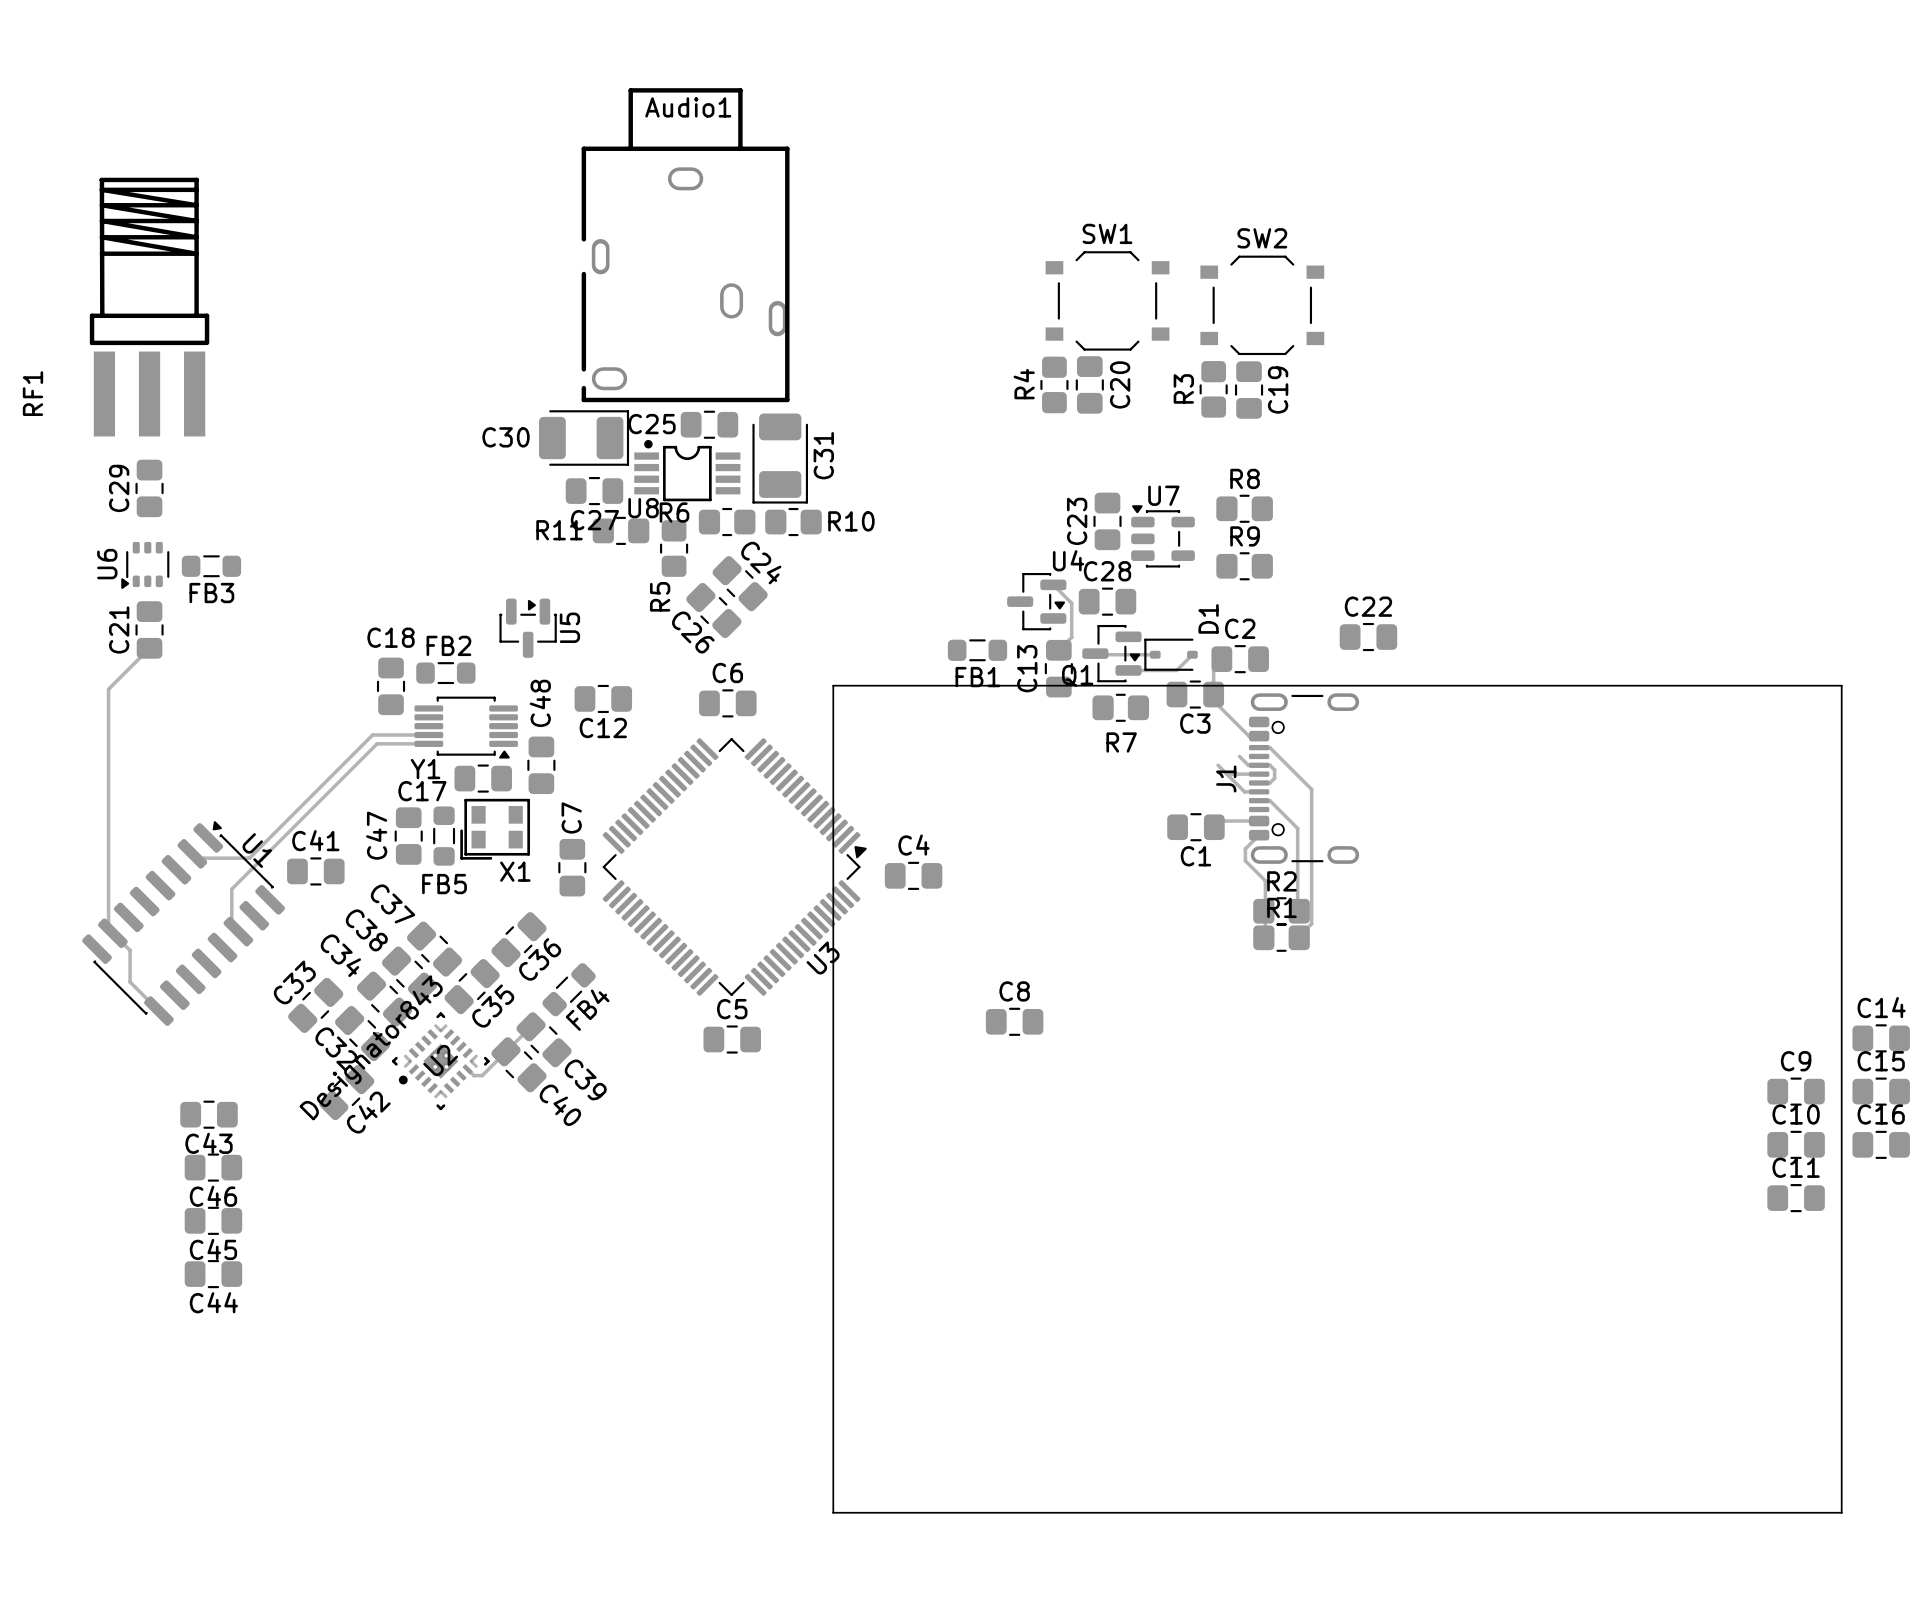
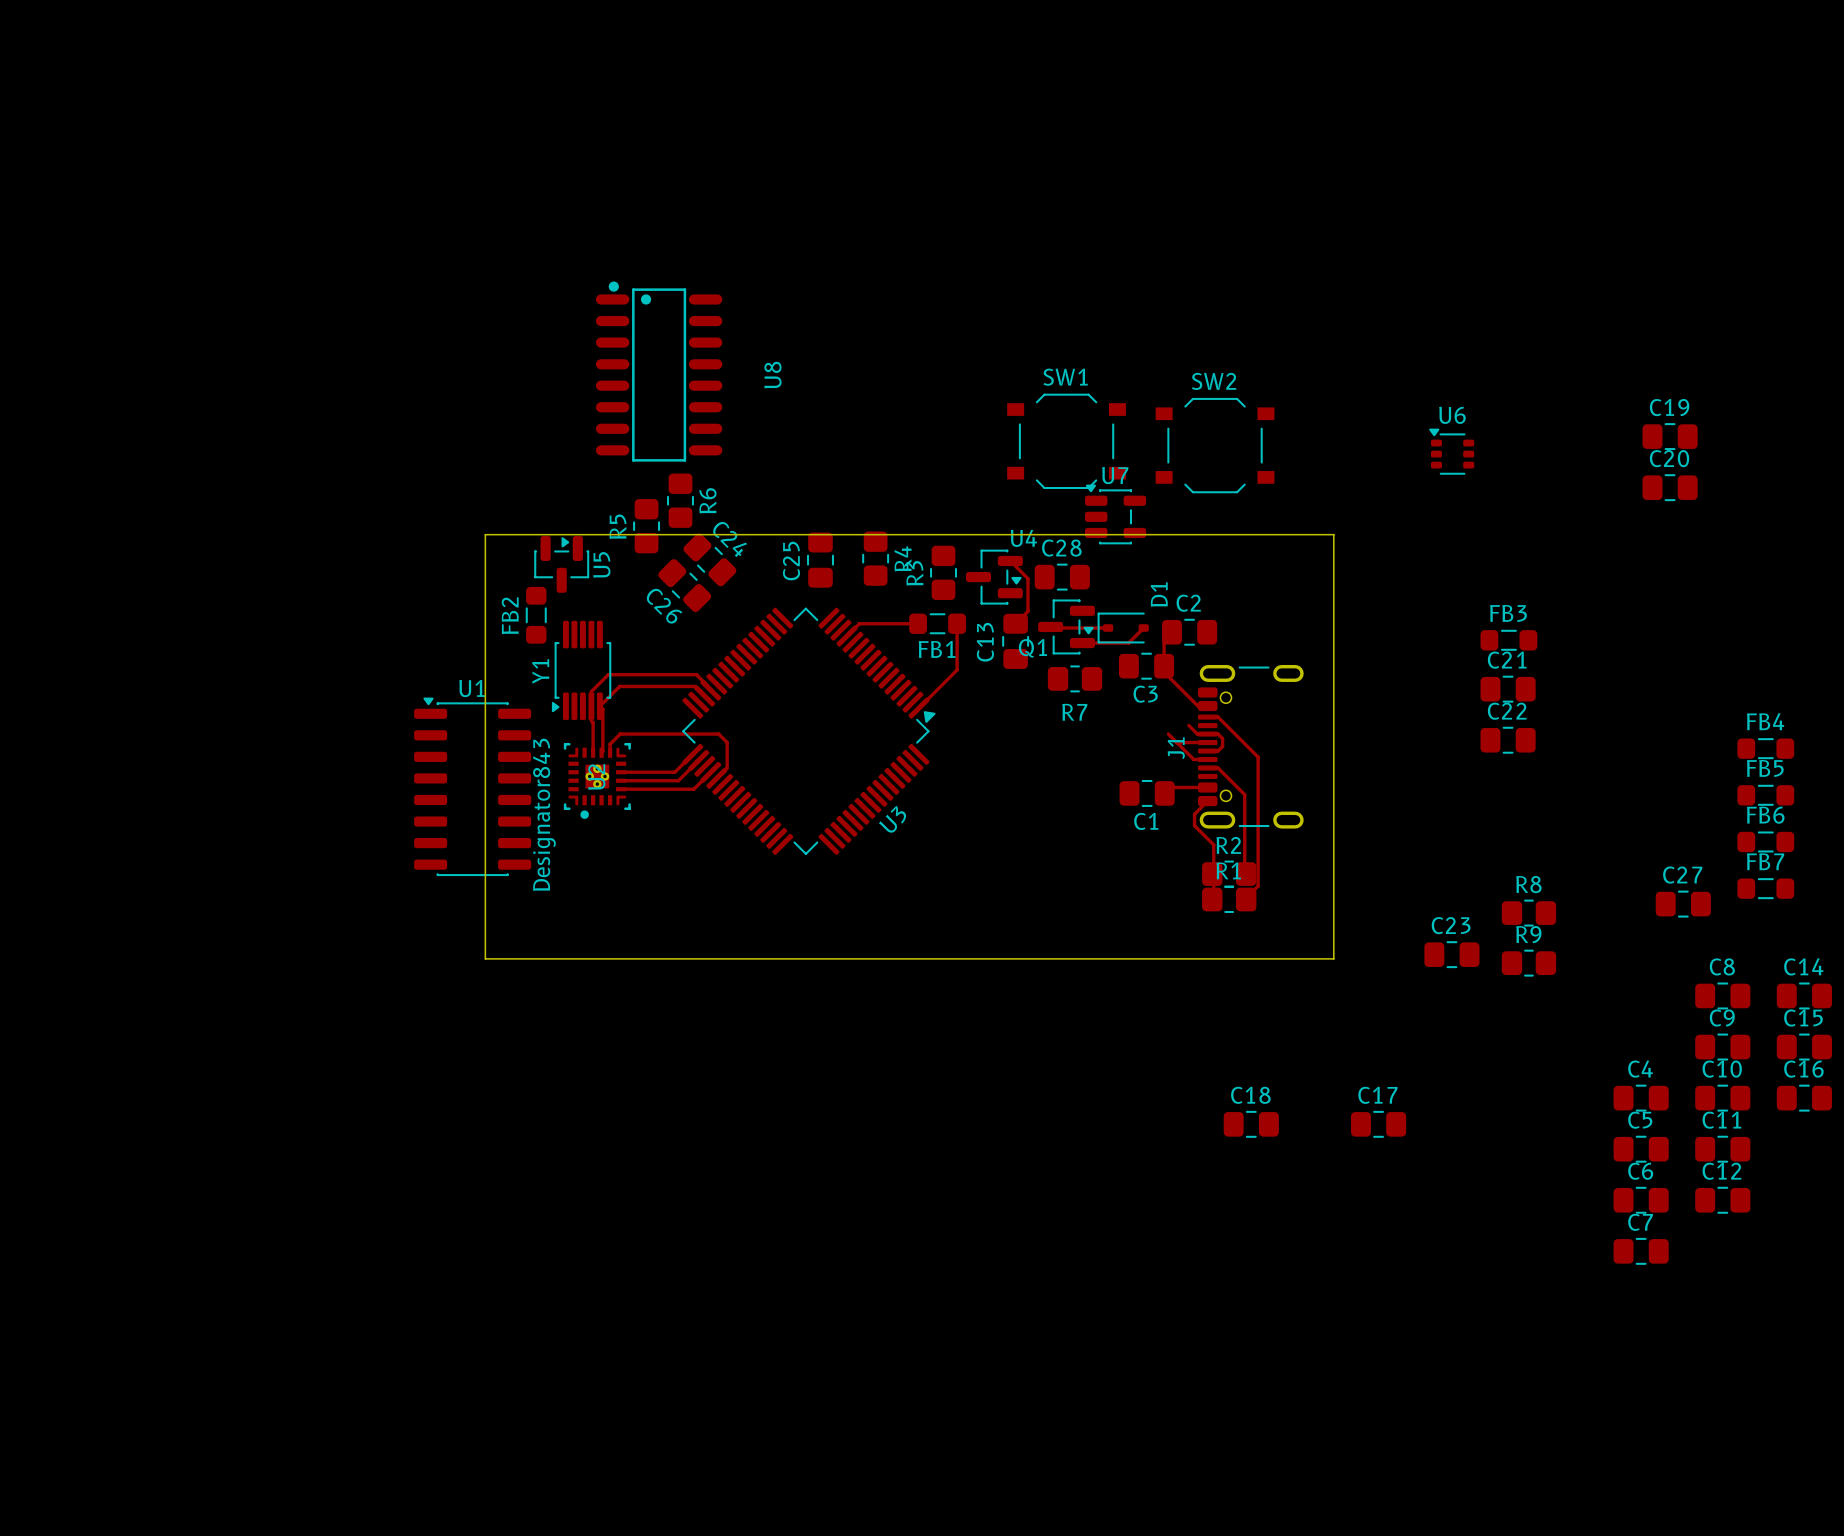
Audio1: (685, 245) -> none
SW1 position: (1107, 300) -> (1066, 441)
SW2 position: (1262, 305) -> (1215, 445)
RF1: (149, 307) -> none
R4 name position: R4 (1024, 384) -> R4 (903, 558)
R4 position: (1054, 384) -> (875, 558)
C20 rotation: 0° (1089, 384) -> 90° clockwise (1670, 487)
C20 position: (1089, 384) -> (1670, 487)
C20 name position: C20 (1120, 384) -> C20 (1669, 458)
R3 position: (1213, 389) -> (943, 572)
C19 rotation: 0° (1249, 390) -> 90° clockwise (1670, 436)
C19 position: (1249, 390) -> (1670, 436)
C19 name position: C19 (1278, 390) -> C19 (1669, 407)
C25 rotation: 0° (709, 424) -> 90° clockwise (820, 560)
C25 position: (709, 424) -> (820, 560)
C30: (584, 438) -> none
U8 footprint: [634, 439, 741, 502] -> [595, 281, 723, 462]
C31: (780, 458) -> none
C29: (149, 488) -> none
C27 position: (594, 491) -> (1683, 904)
U8 name position: U8 (643, 508) -> U8 (772, 375)
R8 position: (1244, 508) -> (1528, 913)
R6 name position: R6 (674, 512) -> R6 (707, 500)
C27 name position: C27 (594, 520) -> C27 (1682, 875)
C23 rotation: 0° (1107, 521) -> 90° clockwise (1451, 954)
C23 position: (1107, 521) -> (1451, 954)
R6 rotation: 0° (727, 522) -> 90° clockwise (680, 500)
R10: (793, 522) -> none
R11: (621, 530) -> none
board edge: none -> (485, 534) (1333, 534) (1333, 958) (485, 958) (485, 534)
U6 rotation: 0° (145, 565) -> 90° clockwise (1451, 451)
U6 position: (145, 565) -> (1451, 451)
FB3 position: (211, 566) -> (1508, 640)
R9 position: (1244, 566) -> (1528, 963)
FB3 name position: FB3 (211, 593) -> FB3 (1508, 613)
R5 name position: R5 (660, 596) -> R5 (617, 526)
U5 position: (528, 628) -> (561, 564)
C21 rotation: 0° (149, 629) -> 90° clockwise (1508, 689)
C21 position: (149, 629) -> (1508, 689)
C22 position: (1368, 637) -> (1508, 740)
FB2 name position: FB2 (448, 645) -> FB2 (510, 615)
track: (149, 648) (108, 689) (108, 928) (130, 950) (130, 982) (158, 1010) -> none
track: none -> (918, 623) (859, 623) (846, 636)
track: none -> (957, 623) (957, 670) (918, 708)
FB2 rotation: 0° (445, 673) -> 90° clockwise (536, 615)
FB2 position: (445, 673) -> (536, 615)
board edge: (833, 685) (1841, 685) (1841, 1512) (833, 1512) (833, 685) -> none
C18 rotation: 0° (391, 686) -> 90° clockwise (1251, 1124)
C18 position: (391, 686) -> (1251, 1124)
C12 position: (603, 698) -> (1722, 1200)
C6 position: (727, 703) -> (1641, 1200)
track: none -> (707, 685) (696, 674) (608, 674) (591, 691) (593, 752)
track: none -> (704, 696) (695, 686) (619, 686) (599, 706) (602, 709) (601, 752)
Y1 rotation: 0° (466, 727) -> 90° clockwise (581, 670)
Y1 position: (466, 727) -> (581, 670)
C12 name position: C12 (603, 728) -> C12 (1721, 1171)
track: (428, 735) (372, 735) (249, 858) (196, 858) (192, 853) -> none
track: (428, 743) (377, 743) (231, 889) (231, 925) (238, 931) -> none
C48: (541, 765) -> none
Y1 name position: Y1 (425, 769) -> Y1 (540, 671)
C17 position: (483, 778) -> (1378, 1124)
track: none -> (610, 752) (610, 744) (620, 734) (718, 734) (727, 742) (727, 767) (716, 778)
track: none -> (692, 754) (674, 772) (621, 772)
C17 name position: C17 (422, 791) -> C17 (1377, 1095)
track: none -> (698, 760) (678, 780) (621, 780)
track: none -> (710, 772) (693, 789) (621, 789)
X1: (495, 829) -> none
C47: (408, 836) -> none
FB5 rotation: 0° (444, 836) -> 90° clockwise (1765, 795)
FB5 position: (444, 836) -> (1765, 795)
C7 rotation: 0° (572, 867) -> 90° clockwise (1641, 1251)
C7 position: (572, 867) -> (1641, 1251)
U3 position: (734, 867) -> (808, 731)
C41: (315, 871) -> none
C4 position: (913, 875) -> (1641, 1098)
FB6: none -> (1765, 841)
FB5 name position: FB5 (444, 884) -> FB5 (1765, 768)
U1 rotation: 0° (183, 923) -> 45° counterclockwise (472, 786)
U1 position: (183, 923) -> (472, 786)
FB7: none -> (1765, 888)
C36: (519, 939) -> none
C37: (434, 949) -> none
C38: (409, 974) -> none
C35: (472, 986) -> none
FB4 rotation: 0° (569, 989) -> 45° clockwise (1765, 748)
FB4 position: (569, 989) -> (1765, 748)
C34: (384, 999) -> none
C33: (315, 1005) -> none
FB4 name position: FB4 (587, 1010) -> FB4 (1765, 721)
C8 position: (1014, 1021) -> (1722, 995)
track: (531, 1026) (482, 1075) (473, 1075) (467, 1069) -> none
C32: (362, 1033) -> none
C39: (544, 1039) -> none
C5 position: (732, 1039) -> (1641, 1149)
U2 rotation: 0° (440, 1061) -> 45° counterclockwise (597, 780)
U2 position: (440, 1061) -> (597, 780)
C40: (519, 1064) -> none
C42: (346, 1092) -> none
C43: (209, 1114) -> none
C46: (213, 1167) -> none
C45: (213, 1220) -> none
C44: (213, 1274) -> none

